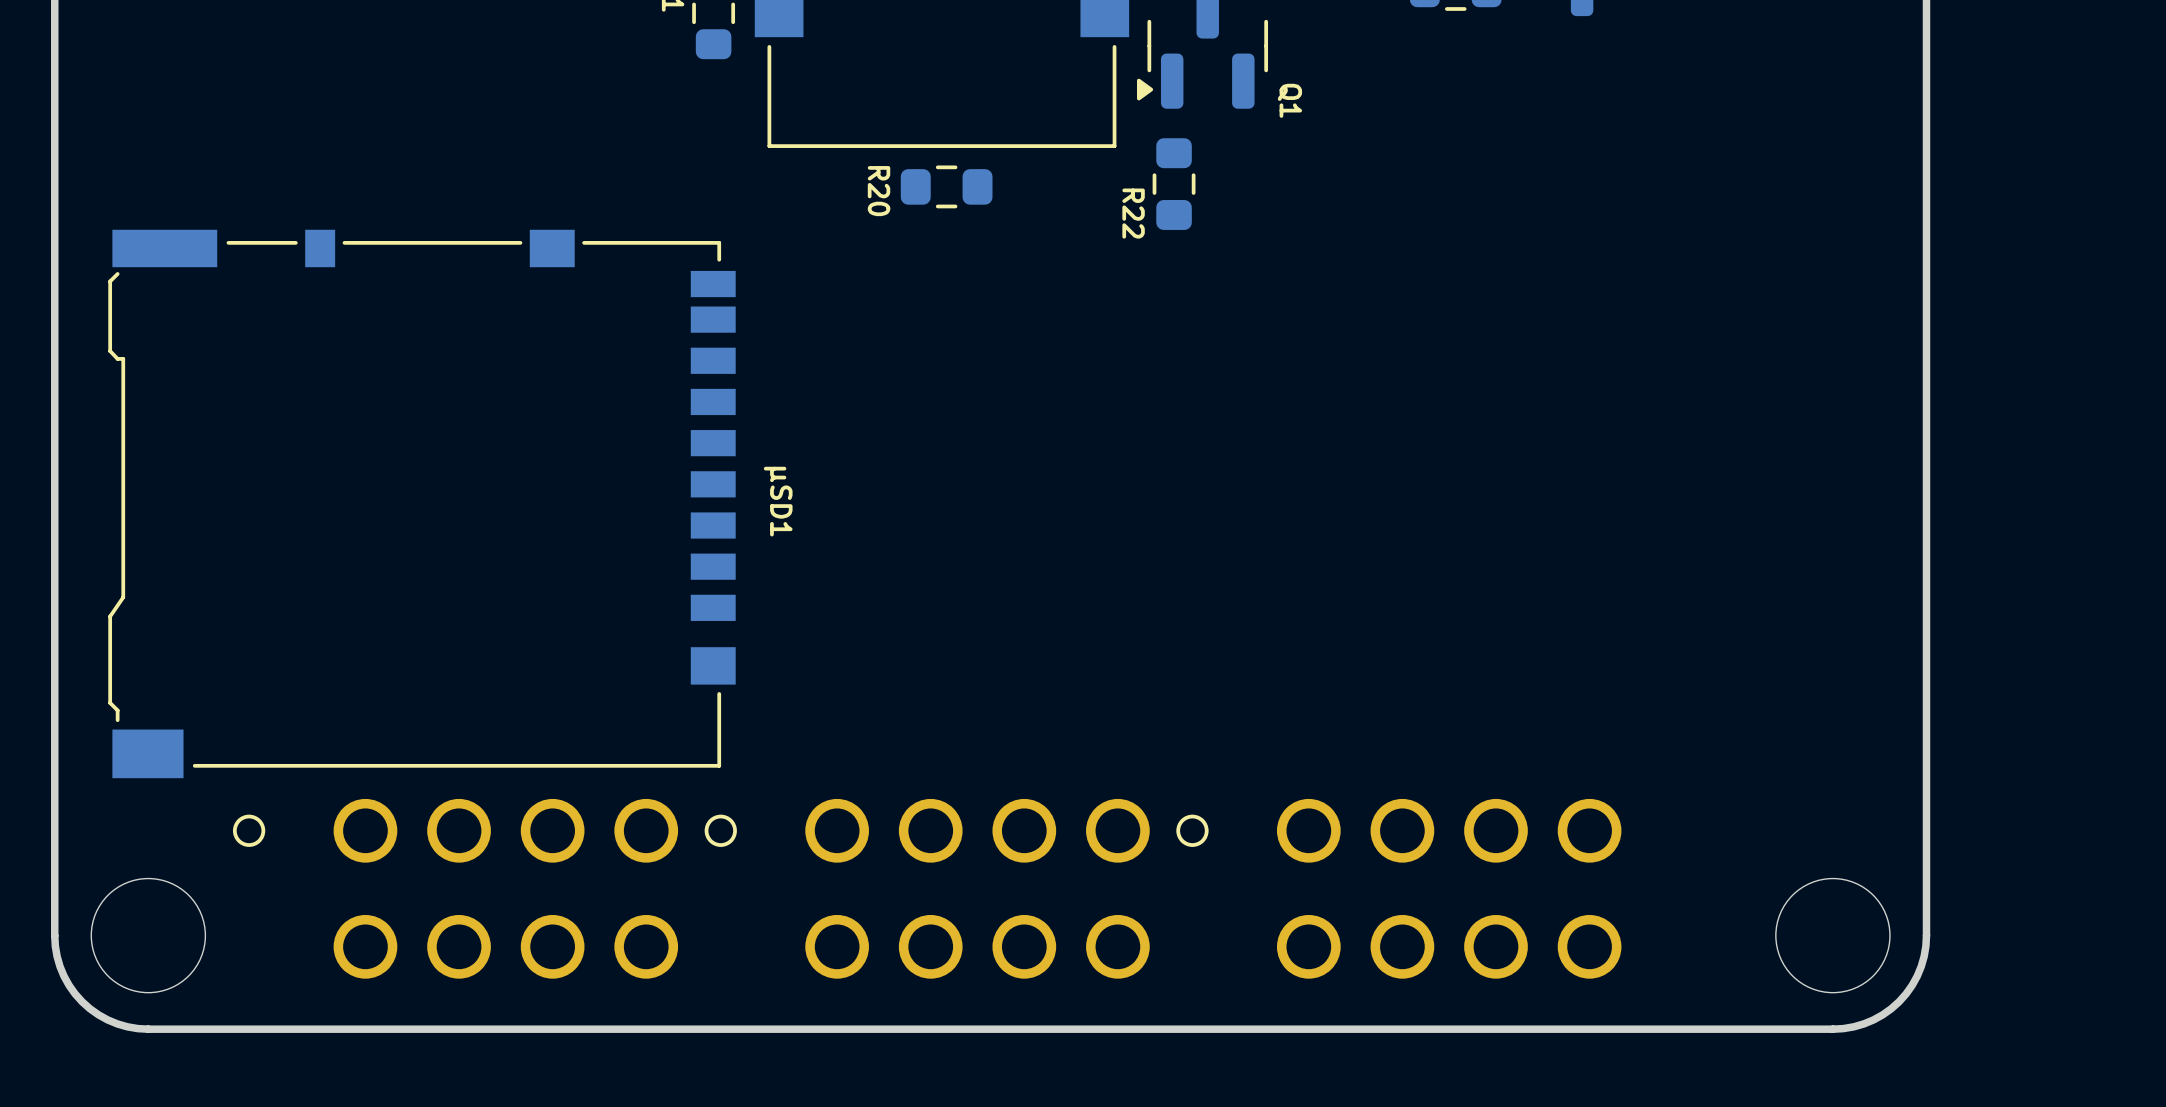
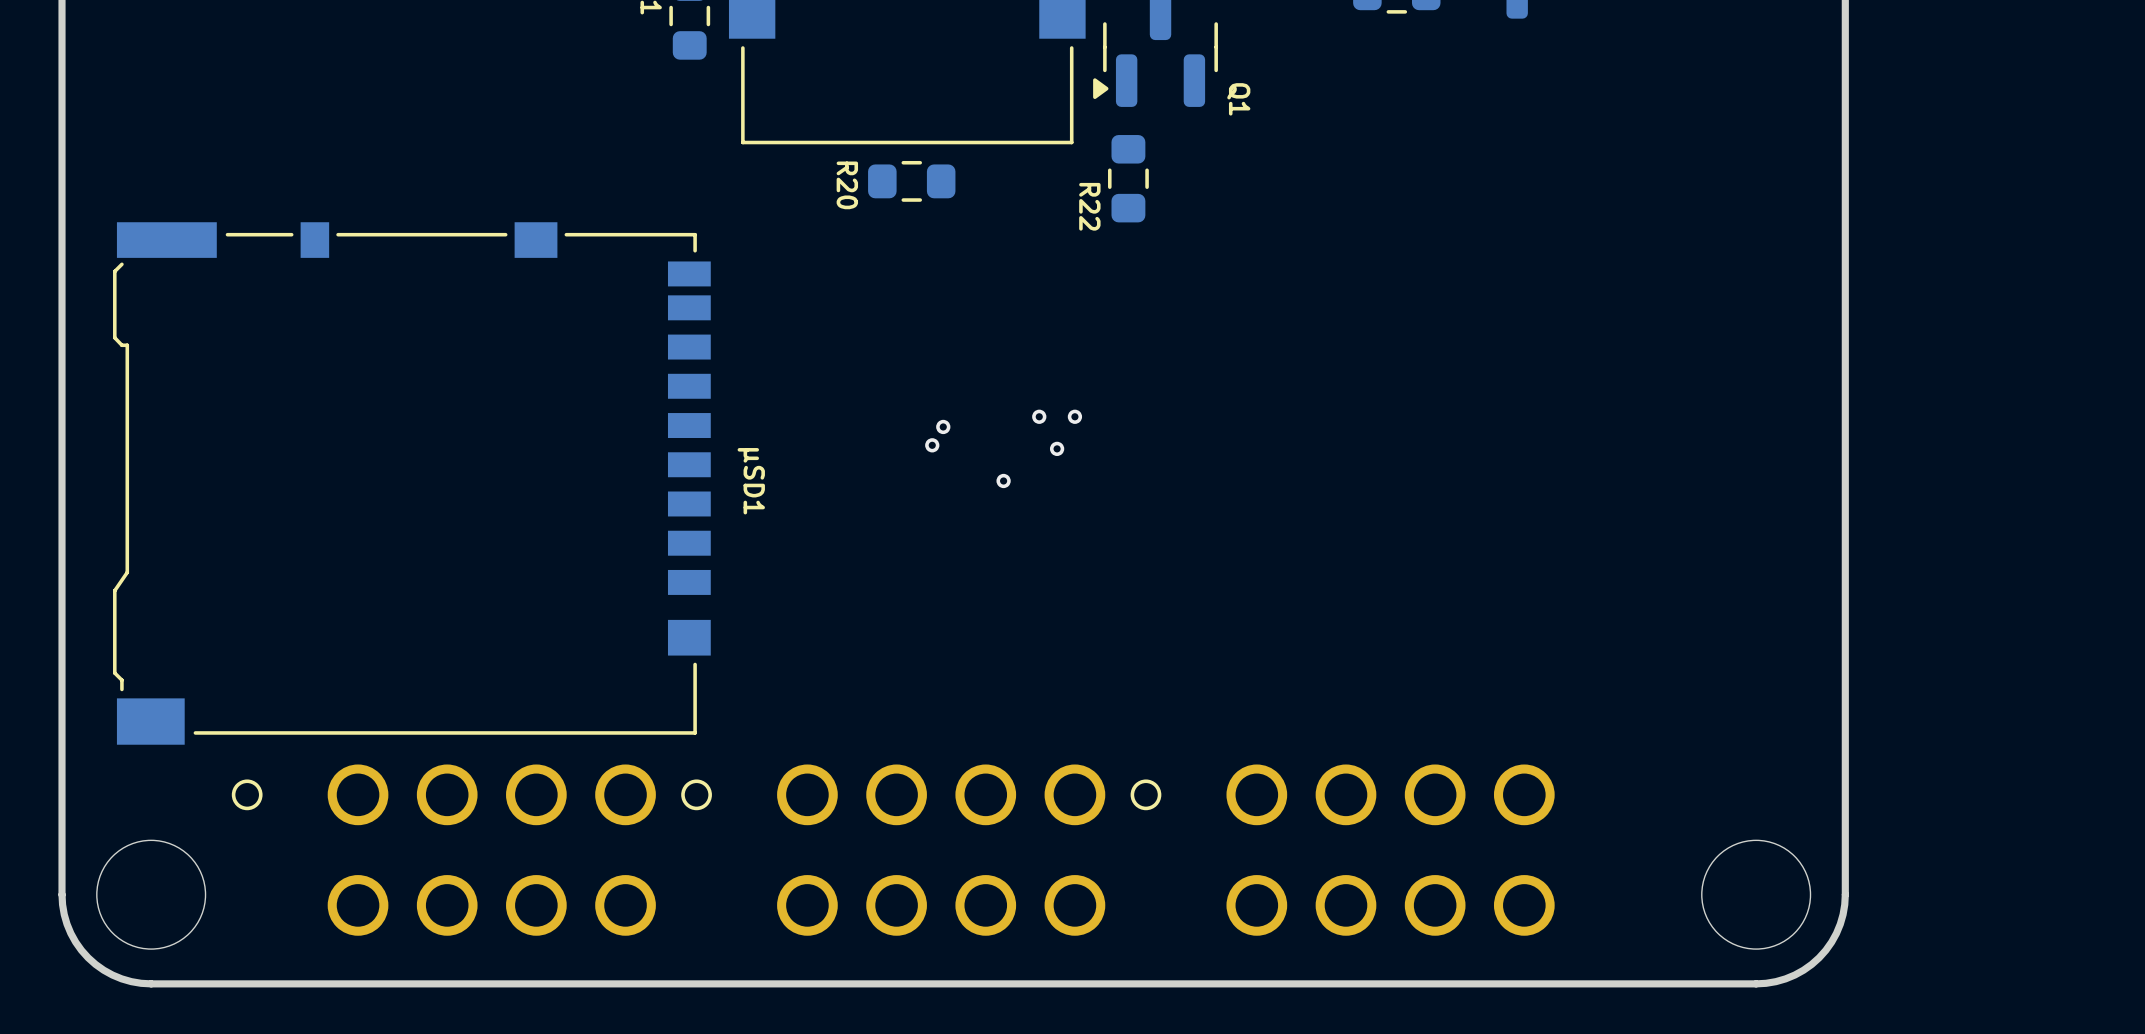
via: none -> (1039, 416)
via: none -> (1074, 416)
via: none -> (943, 426)
via: none -> (932, 445)
via: none -> (1057, 448)
via: none -> (1003, 480)

